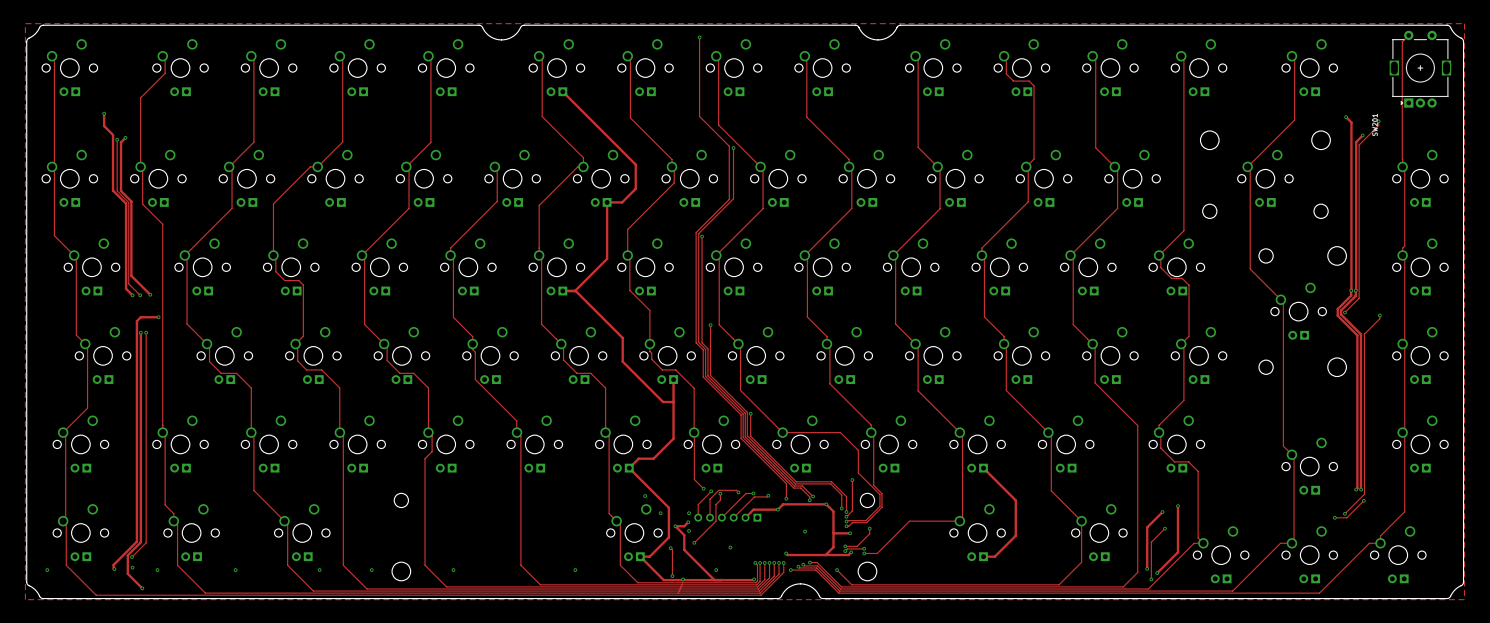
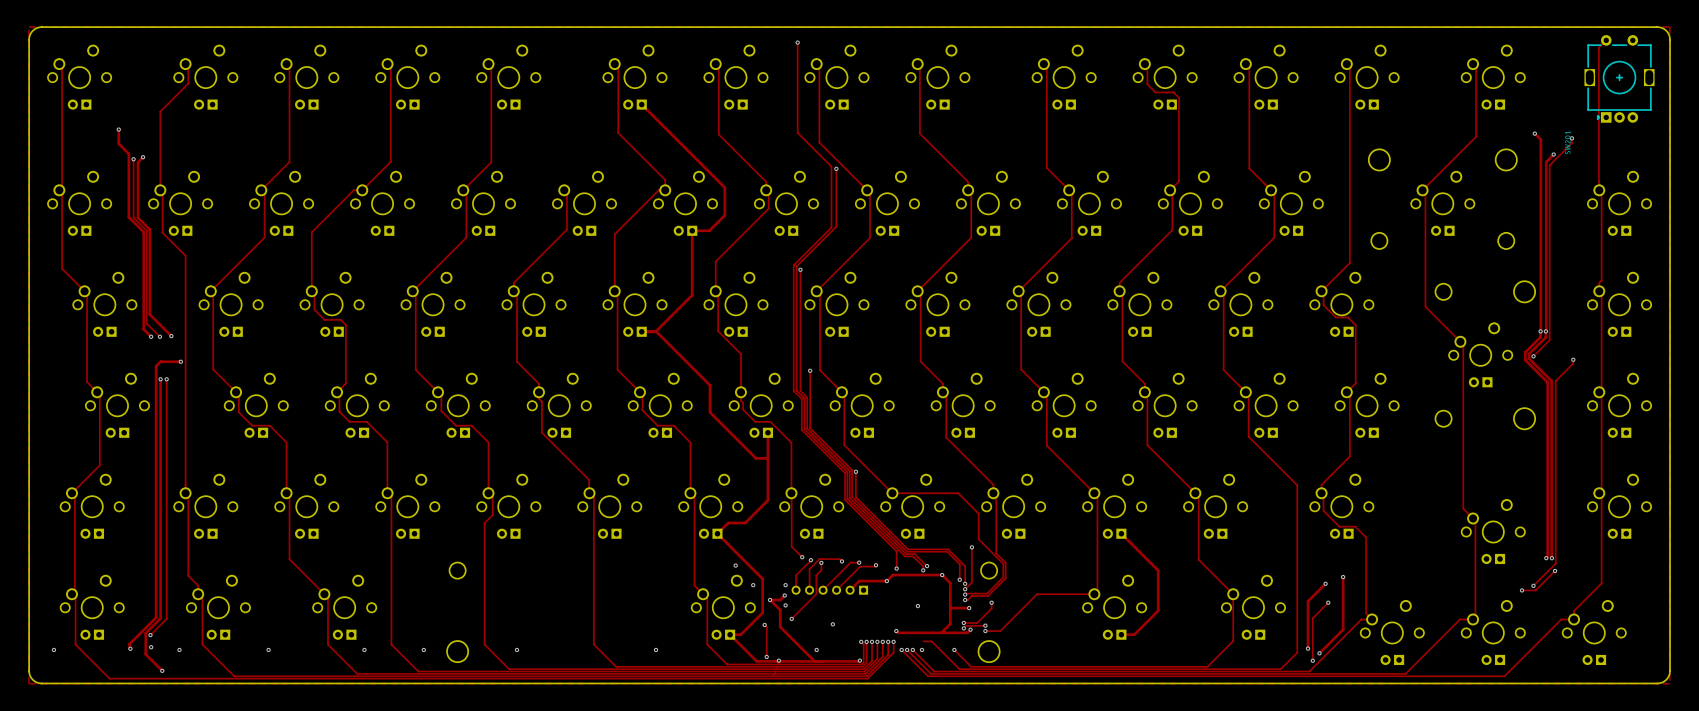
board edge: (43, 25) (479, 25) (490, 36) (501, 39) (512, 36) (524, 25) (855, 25) (866, 36) (877, 39) (889, 36) (900, 25) (1448, 25) (1463, 41) (1463, 583) (1447, 598) (823, 598) (811, 587) (800, 583) (789, 587) (777, 598) (41, 598) (26, 582) (26, 41) (43, 25) -> (41, 27) (32, 30) (29, 39) (29, 670) (31, 678) (36, 682) (1657, 683) (1665, 680) (1669, 675) (1670, 39) (1668, 33) (1662, 28) (41, 27)
via: (809, 562) -> none
track: (803, 564) (817, 565) (840, 588) -> (912, 649) (934, 671) (958, 671)
via: (803, 564) -> none
track: (798, 566) (816, 567) (839, 591) -> (907, 649) (931, 673) (957, 673)
via: (798, 566) -> none
track: (790, 570) (815, 570) (838, 593) -> (901, 649) (928, 676) (956, 676)
via: none -> (907, 649)
via: none -> (912, 649)
via: none -> (921, 649)

